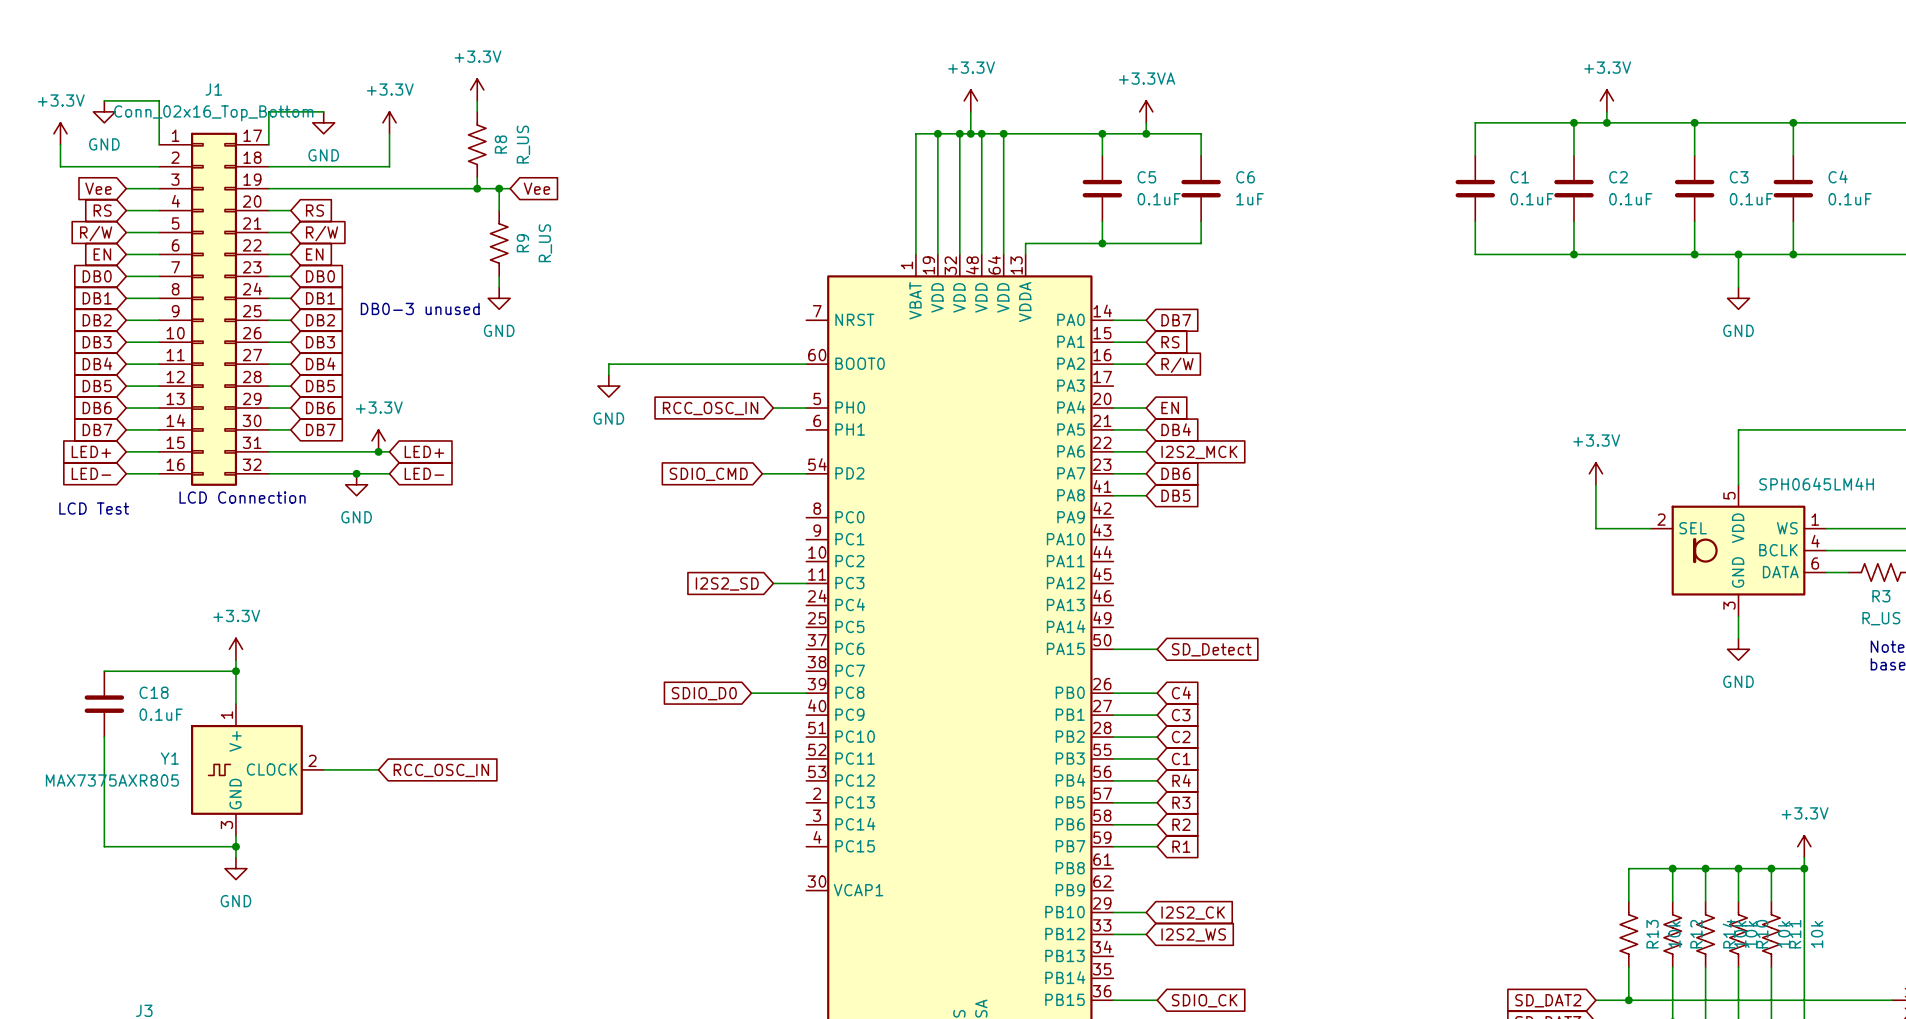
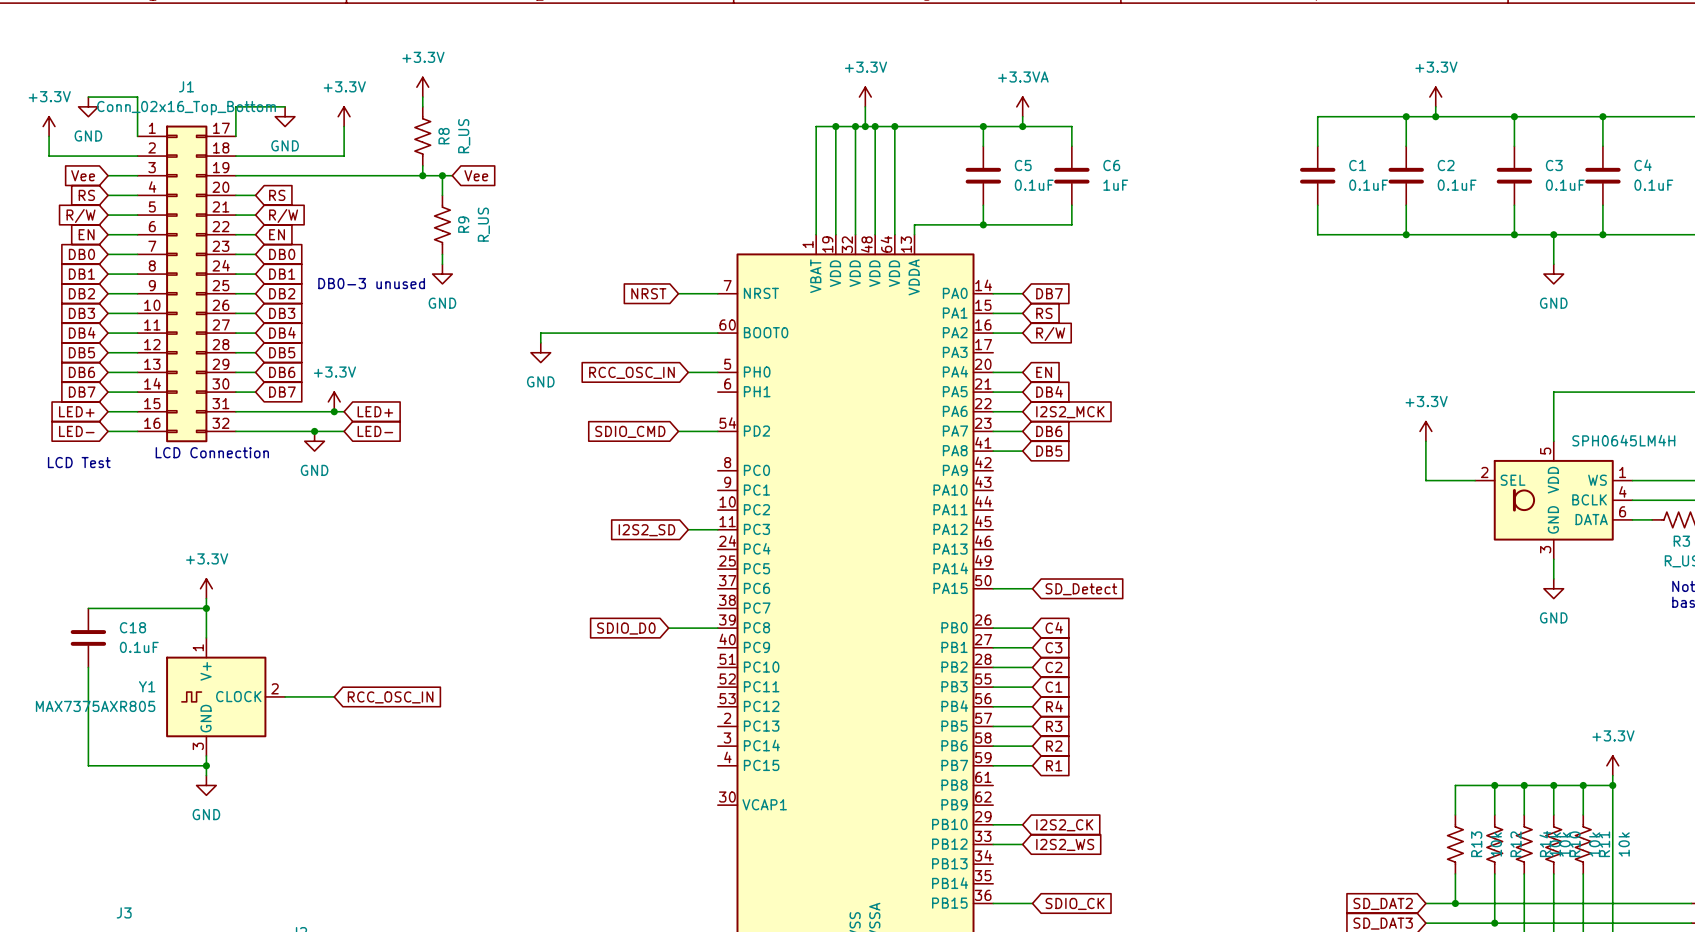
global label: none -> NRST (648, 293)
wire: none -> (678, 293) (717, 293)

